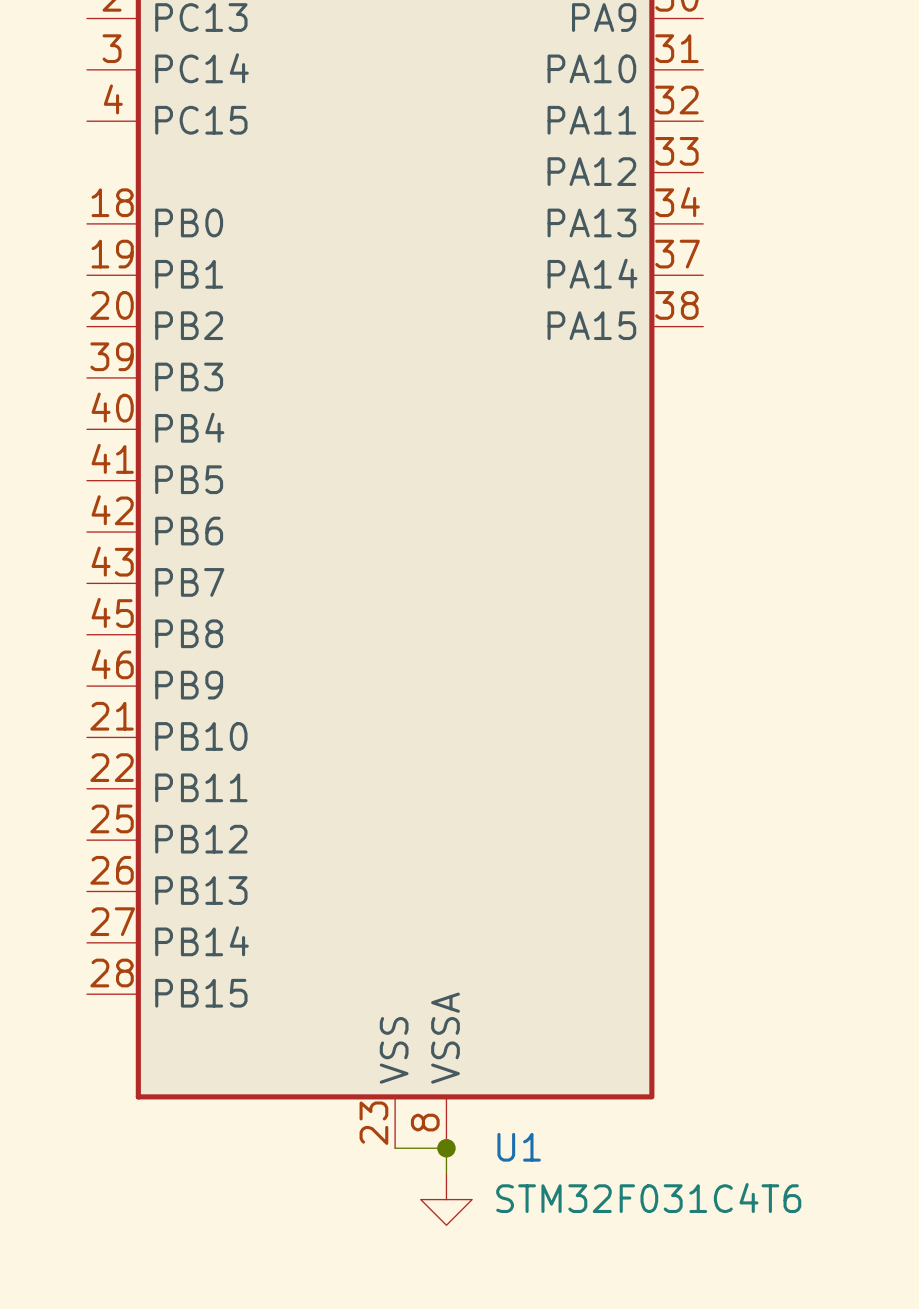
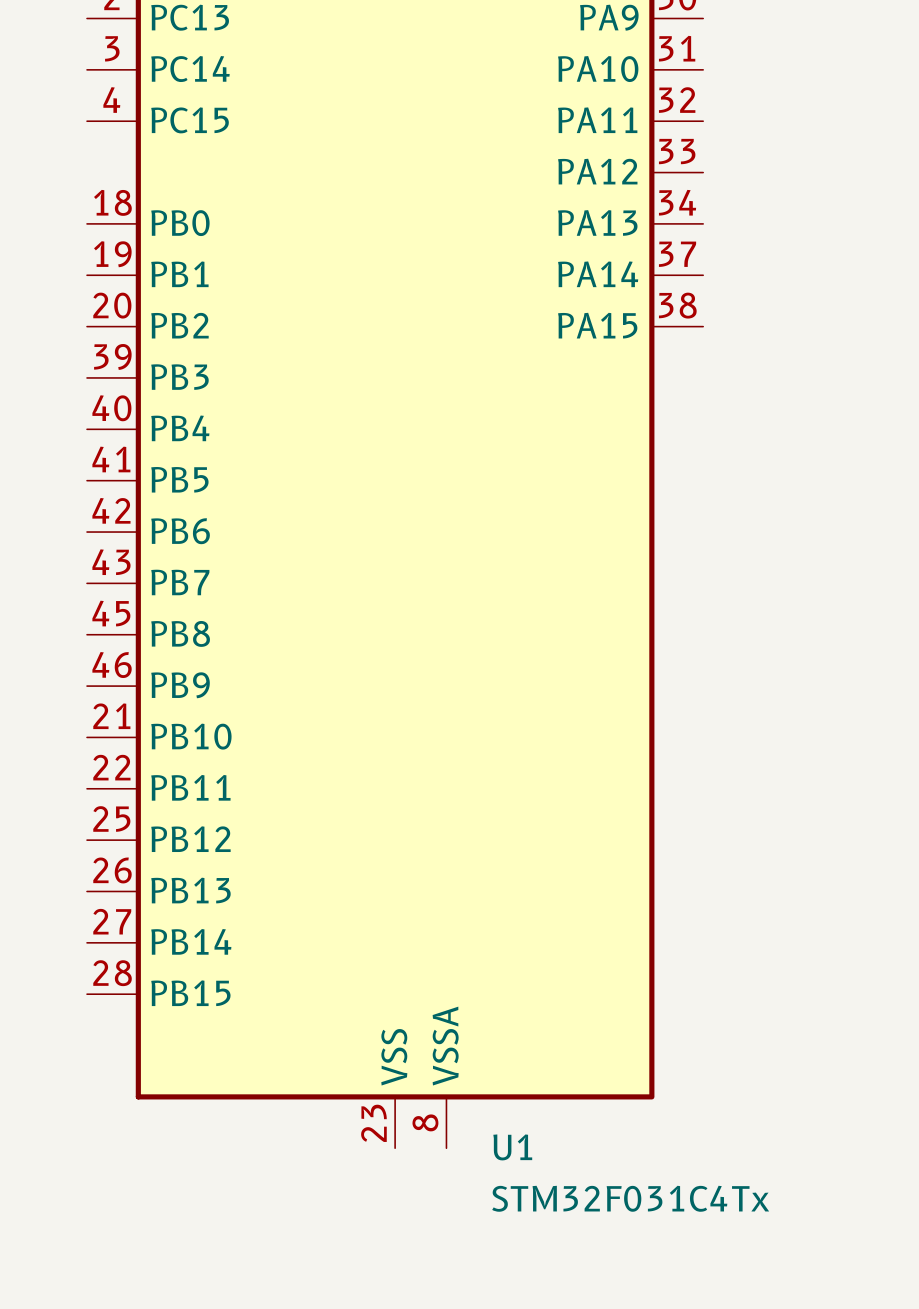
wire: (395, 1148) (446, 1148) (446, 1173) -> none
junction: (446, 1148) -> none
U1 value: STM32F031C4T6 (648, 1198) -> STM32F031C4Tx (630, 1198)
power symbol: (446, 1199) -> none

